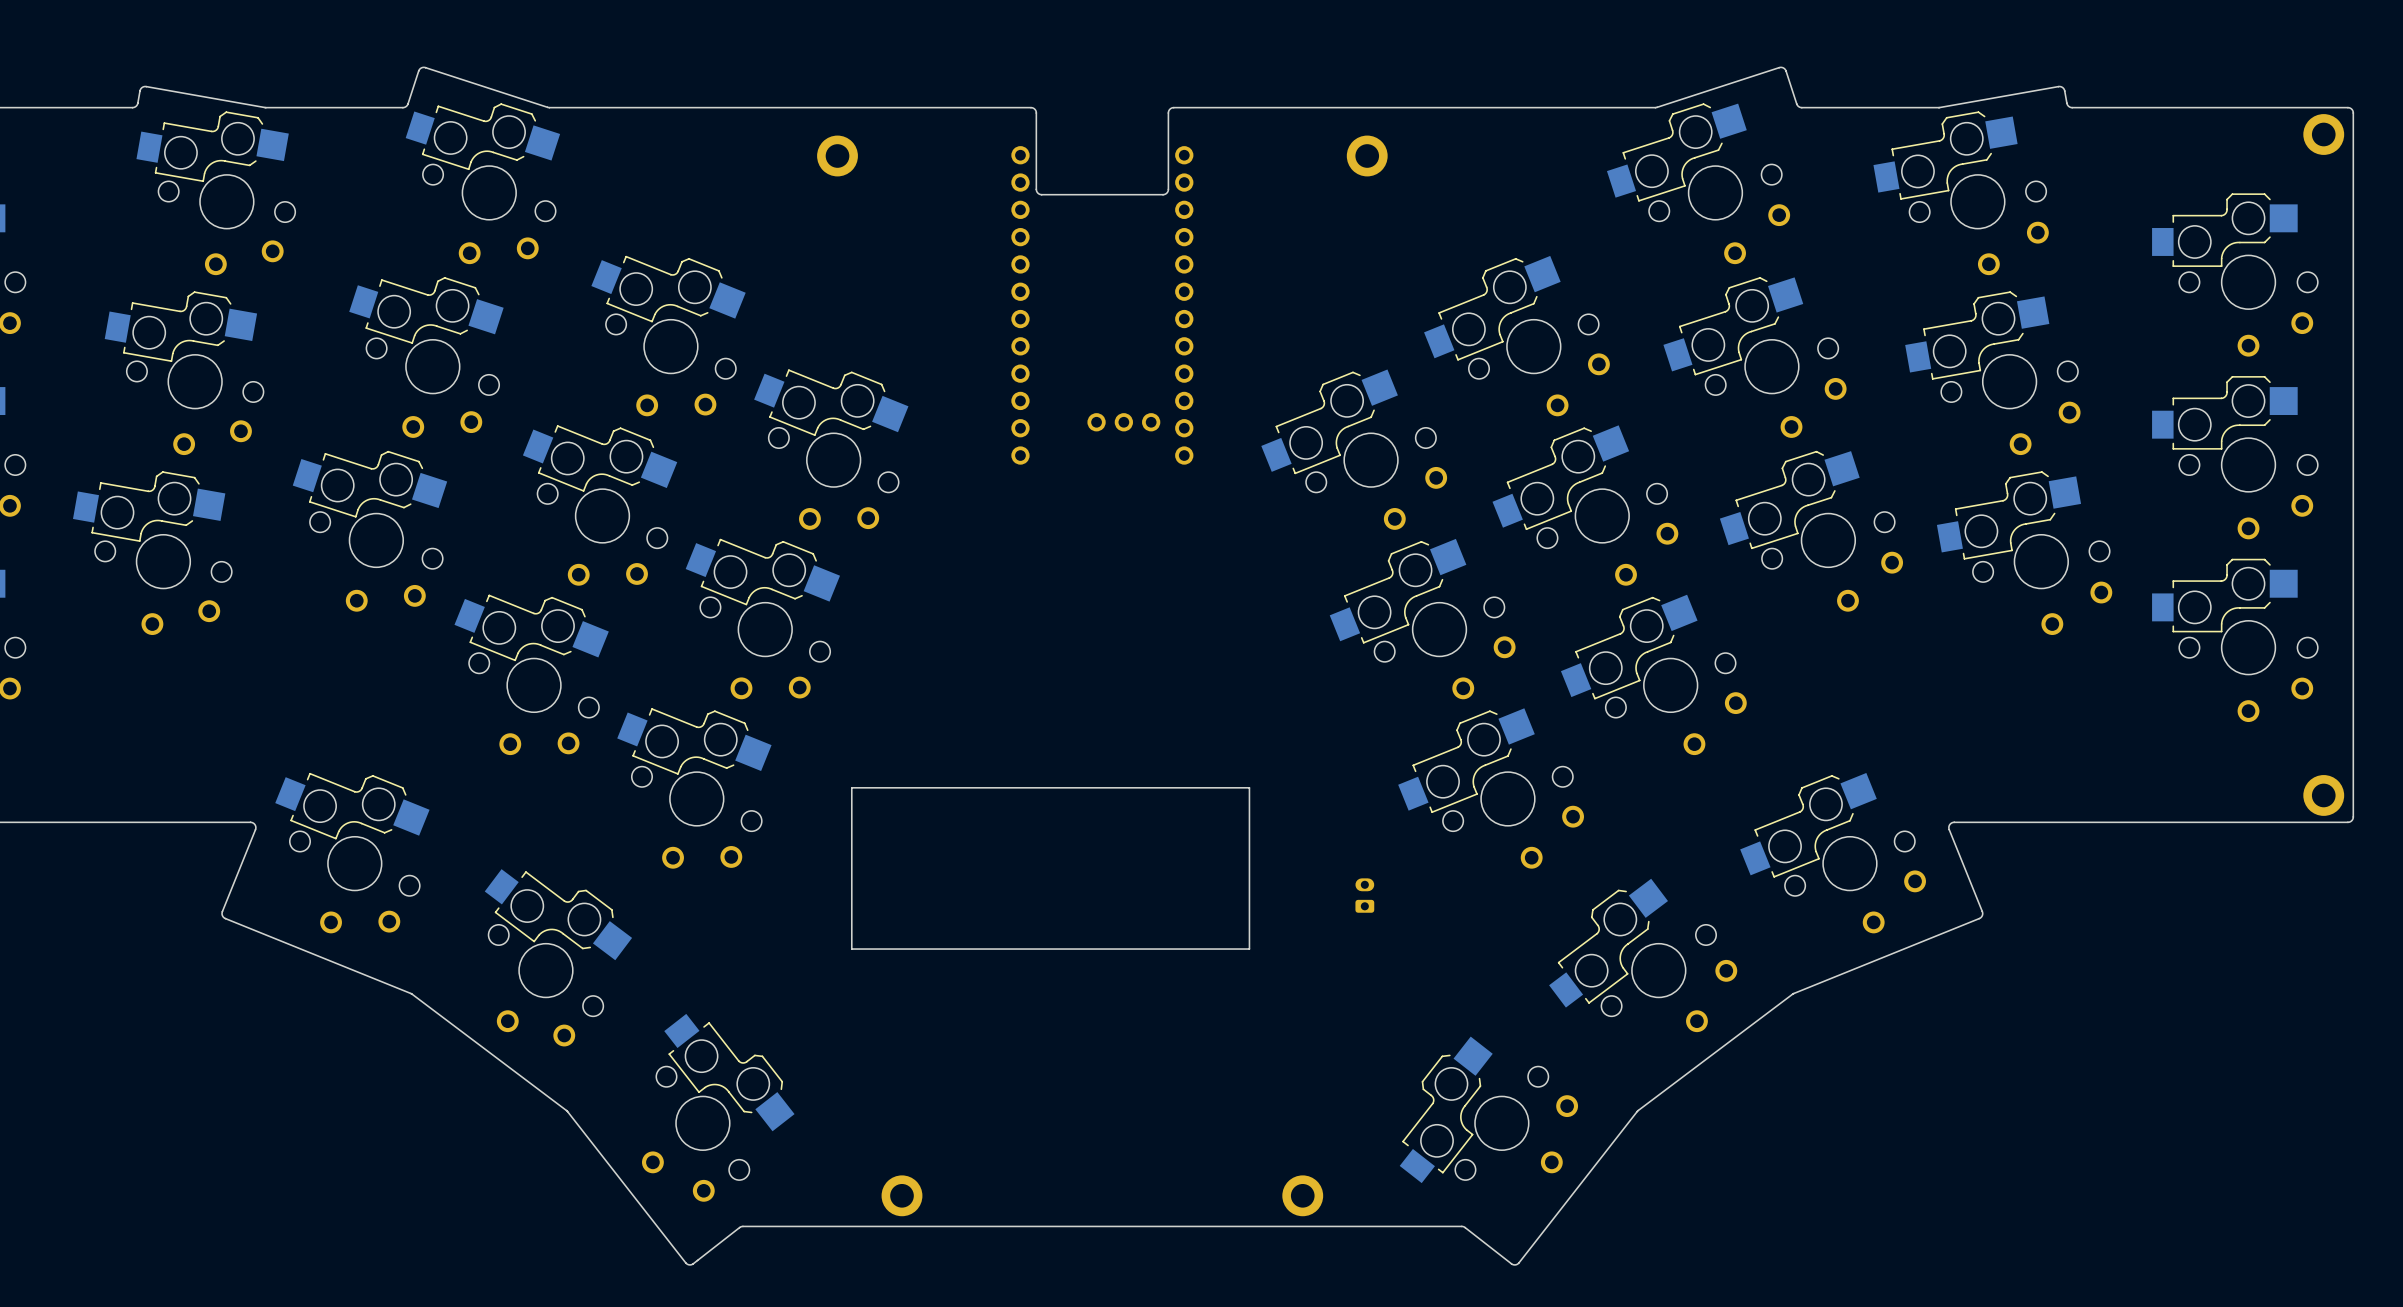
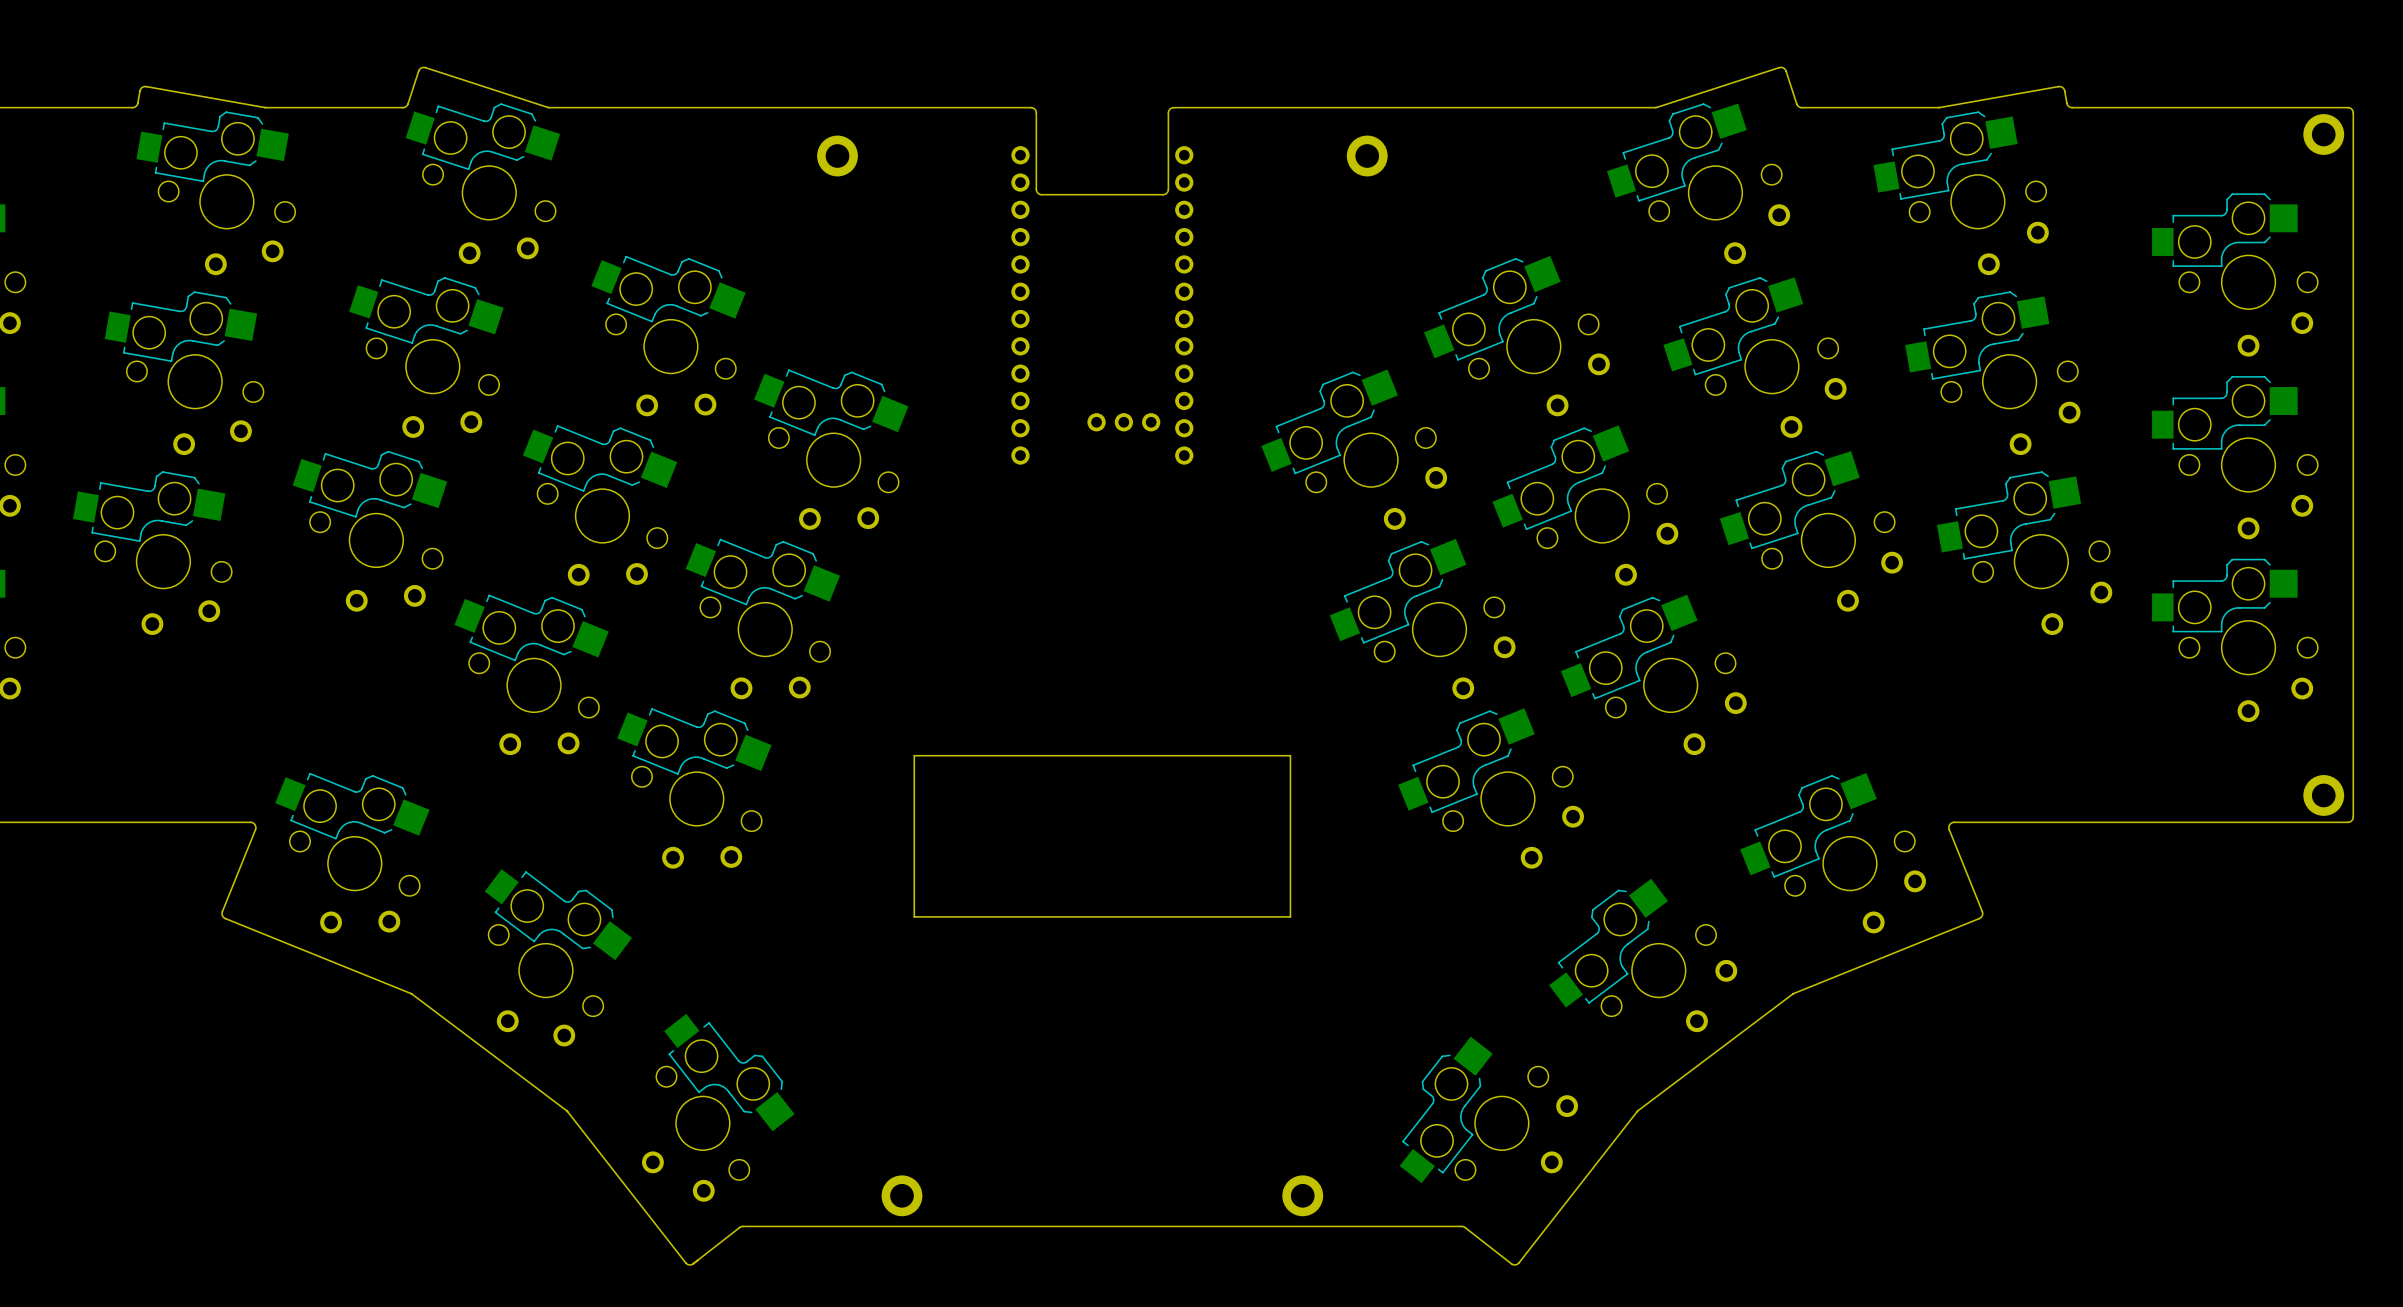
board edge: (1249, 787) (851, 787) (851, 949) (1249, 949) (1249, 787) -> (1290, 755) (1290, 916) (914, 916) (914, 755) (1290, 755)
part: (1364, 895) -> none

